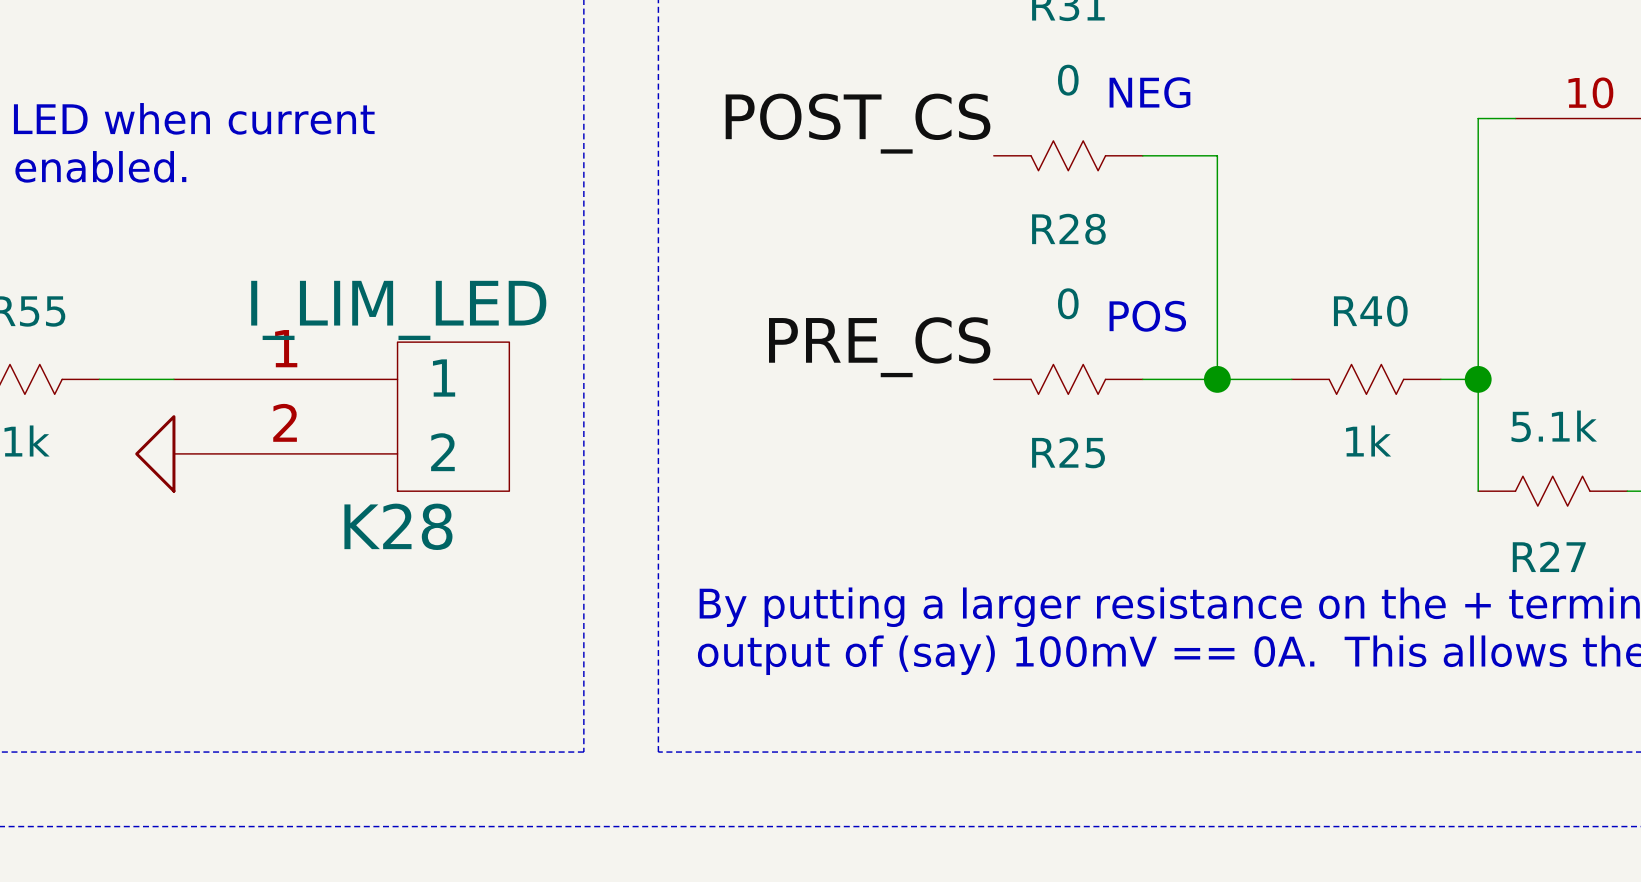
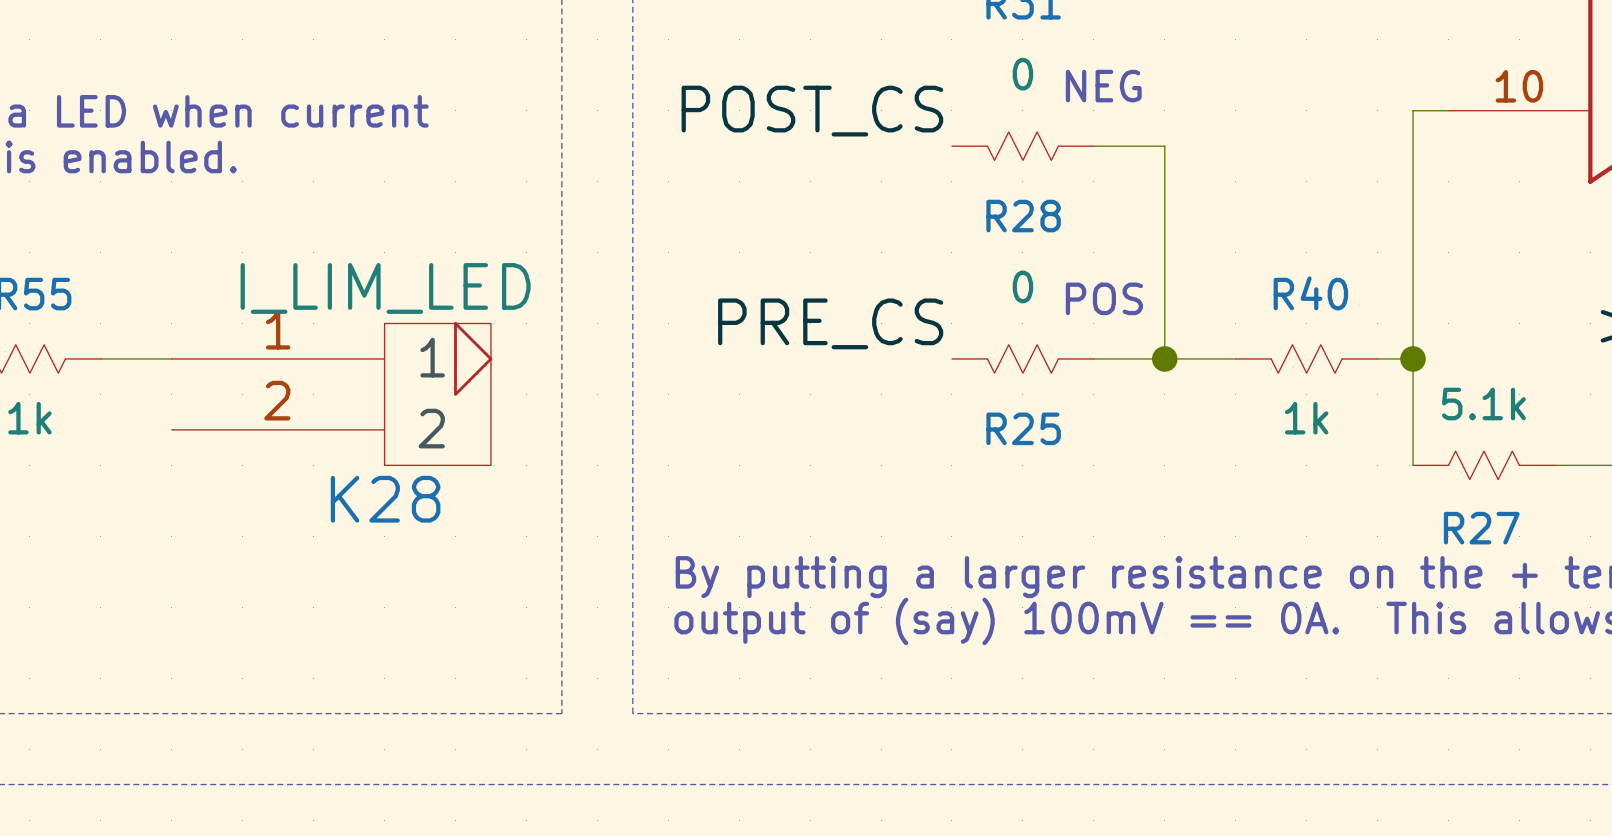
power symbol rotation: 0° (155, 453) -> 180° (473, 358)
power symbol position: (155, 453) -> (473, 358)

